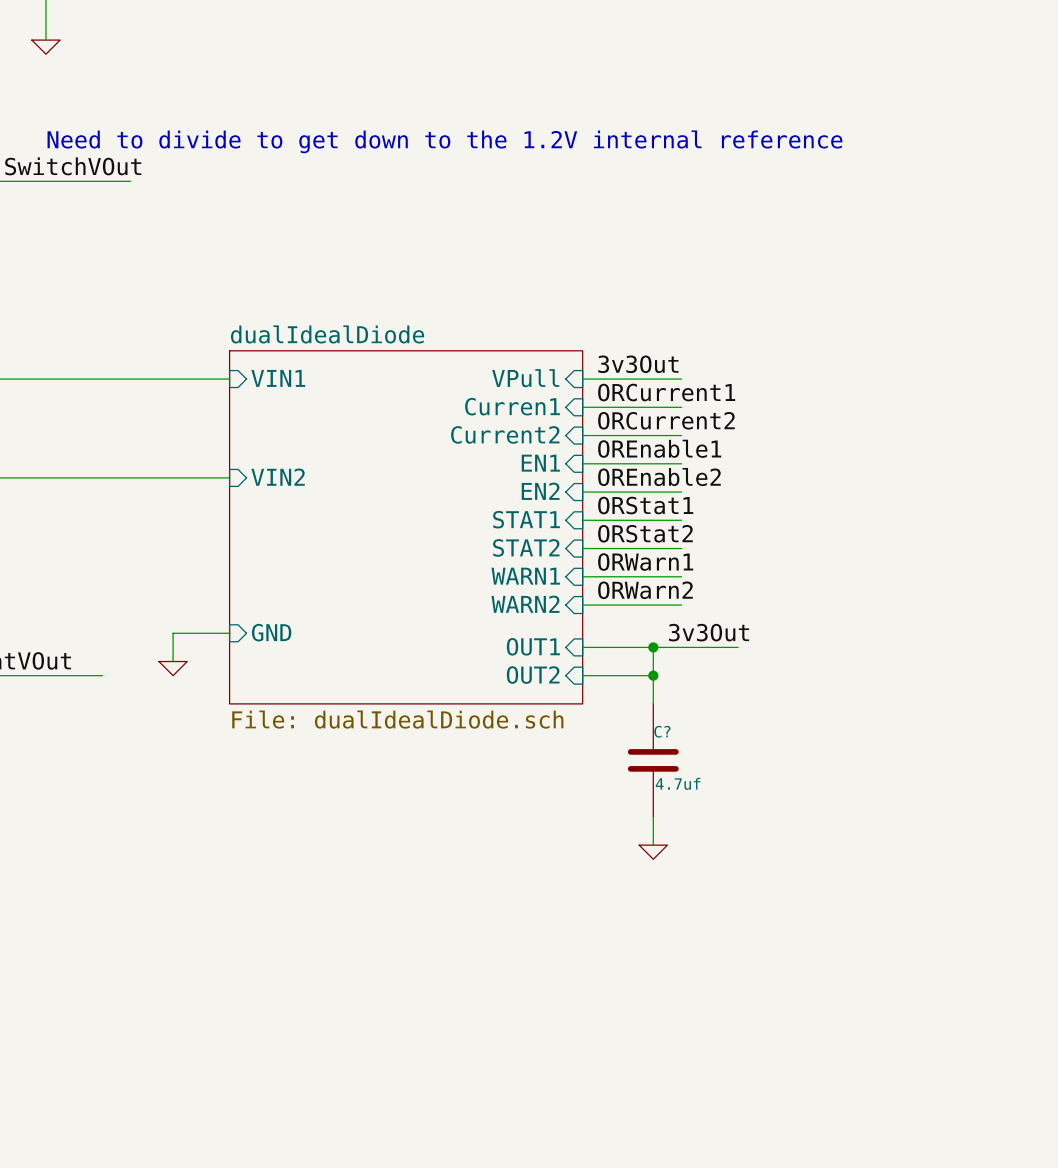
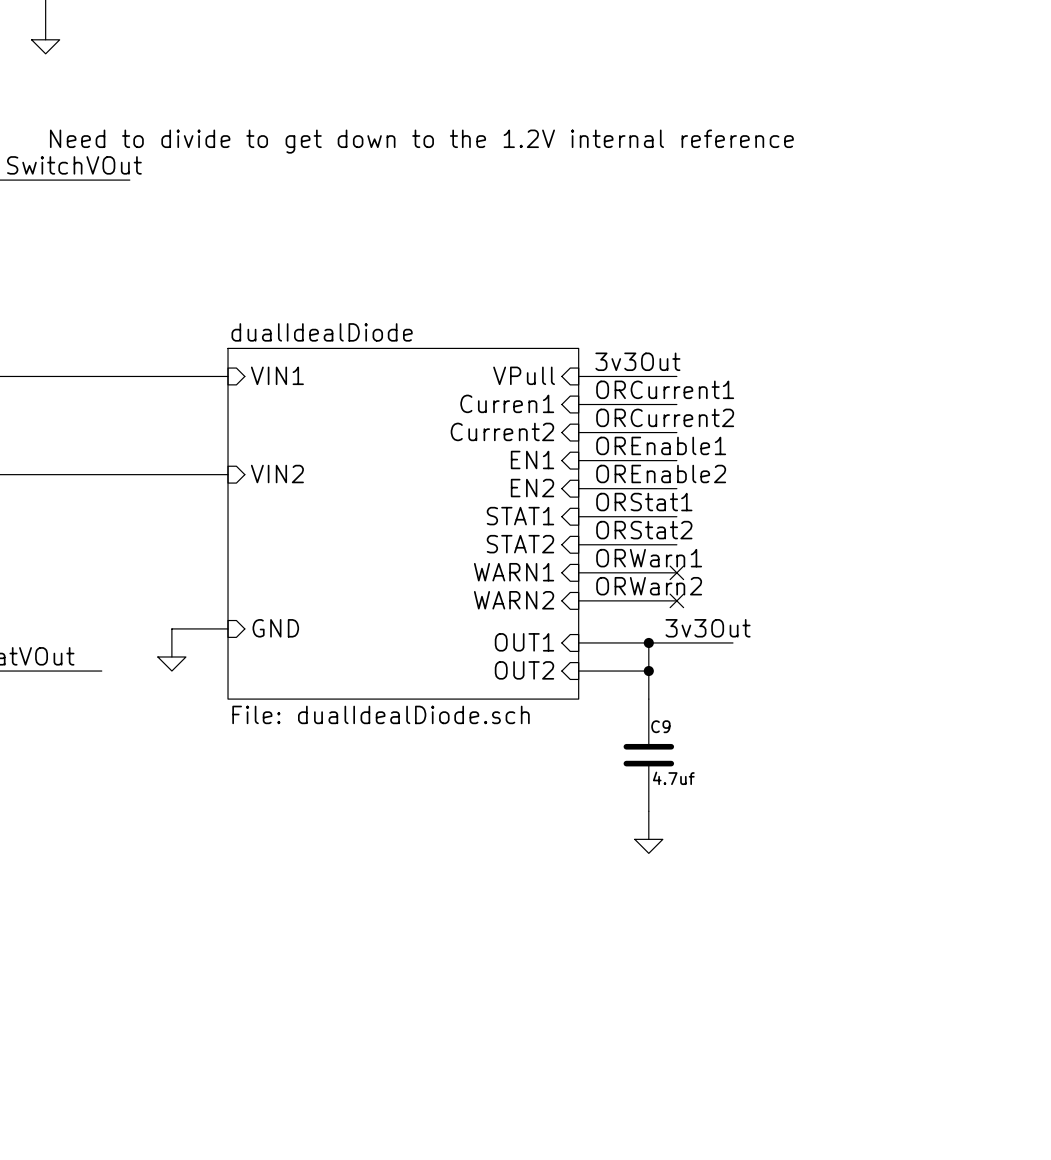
no-connect mark: none -> (676, 572)
no-connect mark: none -> (676, 600)
C? name: C? (662, 731) -> C9 (660, 726)

